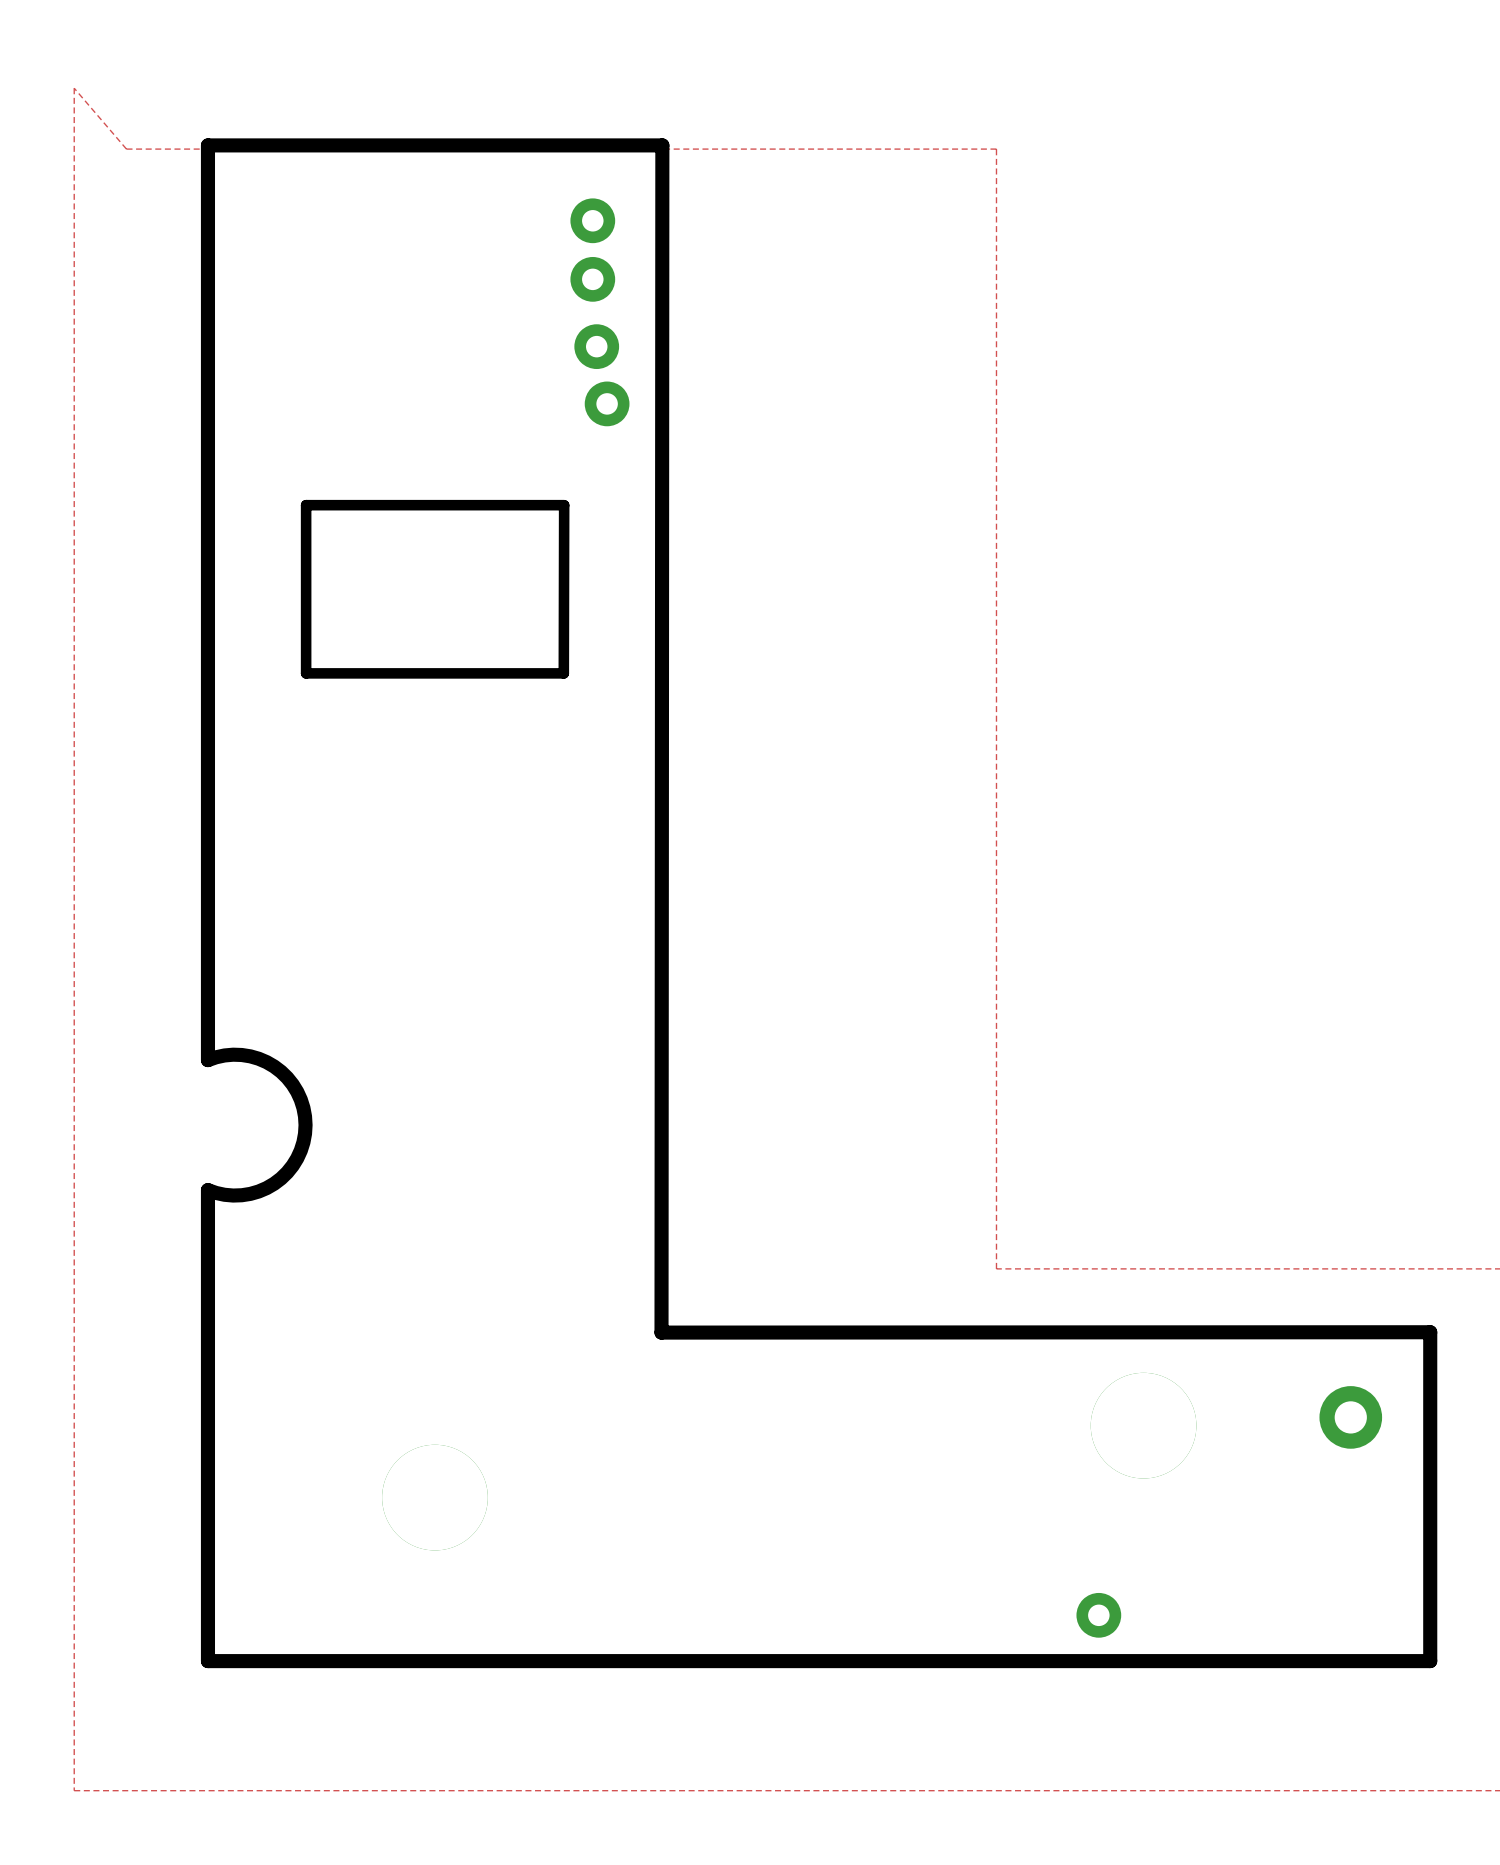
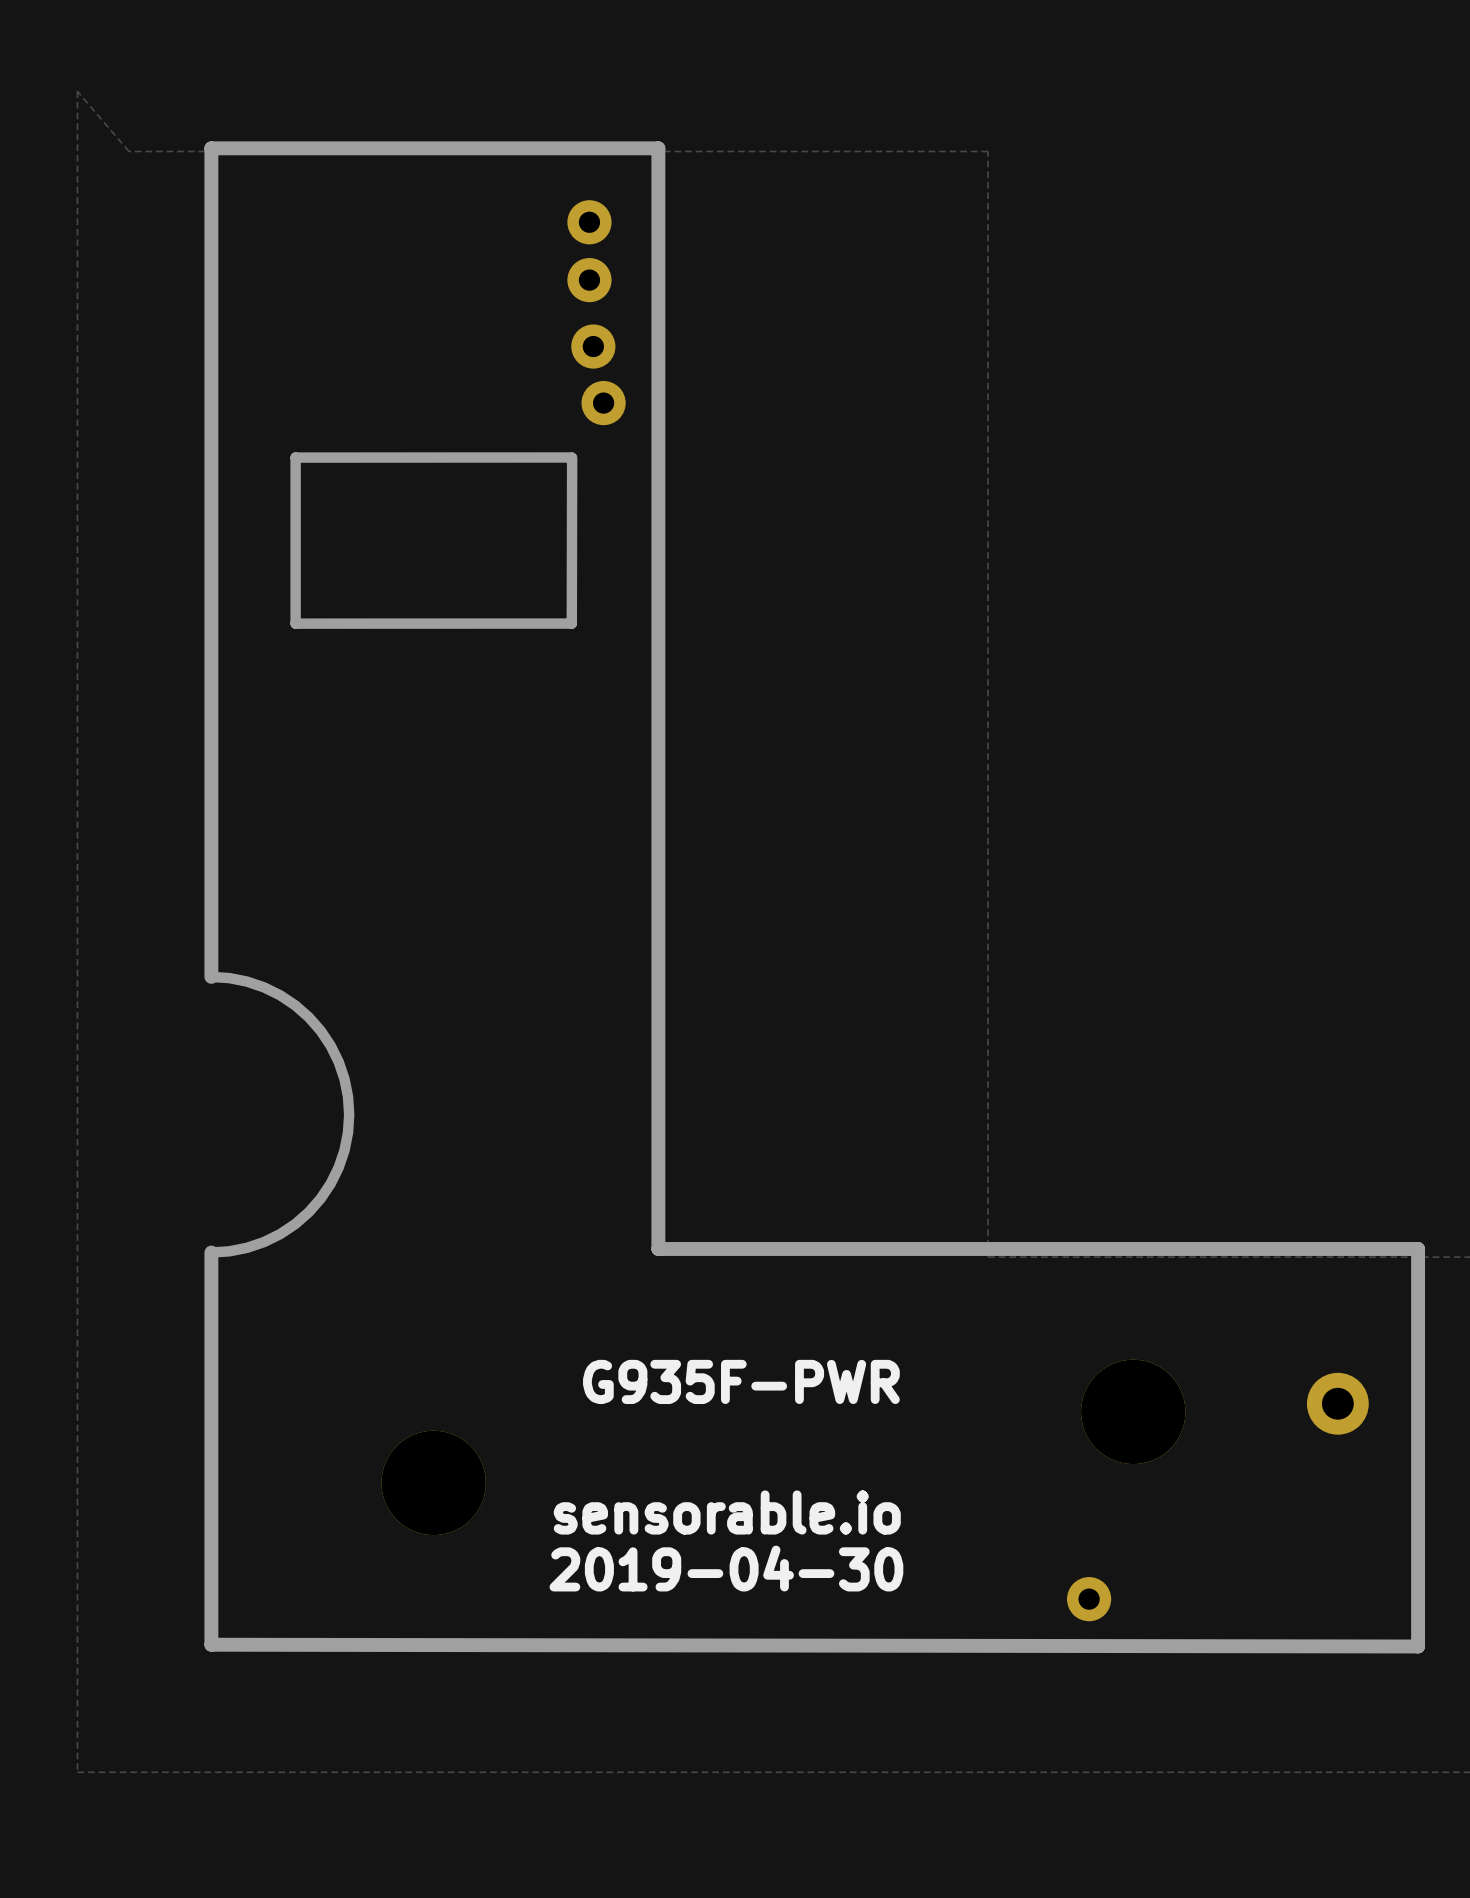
board edge: (207, 145) (662, 145) (661, 1332) (1430, 1332) (1430, 1661) (207, 1661) (207, 1190) (224, 1194) (241, 1195) (258, 1191) (274, 1183) (287, 1172) (297, 1158) (303, 1142) (305, 1125) (303, 1107) (297, 1091) (287, 1077) (274, 1066) (258, 1058) (241, 1054) (224, 1055) (207, 1060) (207, 145) -> (211, 148) (211, 976) (229, 978) (264, 987) (295, 1005) (308, 1017) (320, 1030) (338, 1061) (348, 1096) (349, 1114) (348, 1132) (338, 1167) (320, 1198) (308, 1212) (295, 1224) (264, 1242) (229, 1251) (211, 1252) (211, 1644) (1418, 1646) (1418, 1248) (658, 1248) (658, 148) (211, 148)
board edge: (564, 505) (306, 505) (306, 673) (563, 673) (564, 505) -> (571, 457) (295, 457) (295, 623) (571, 623) (572, 457)
text: none -> G935F-PWR (741, 1381)
text: none -> sensorable.io (727, 1512)
text: none -> 2019-04-30 (726, 1568)

